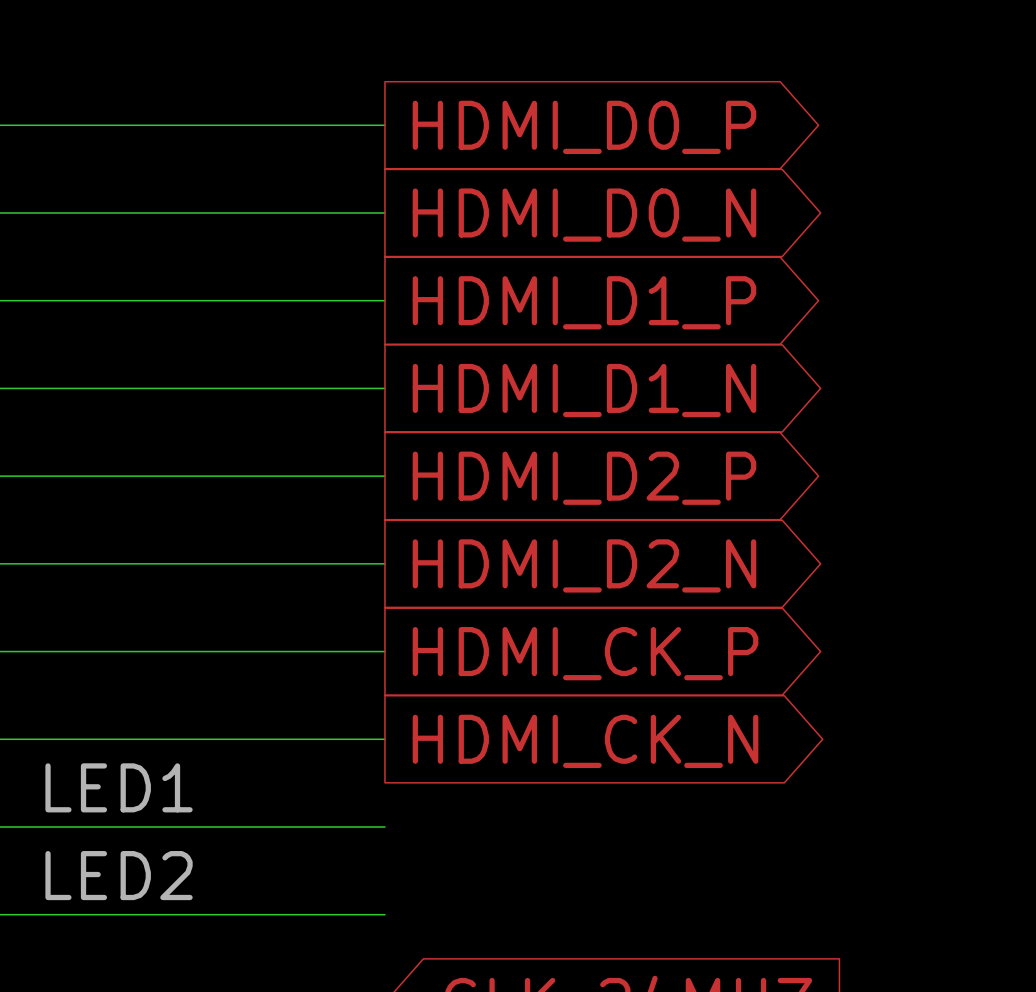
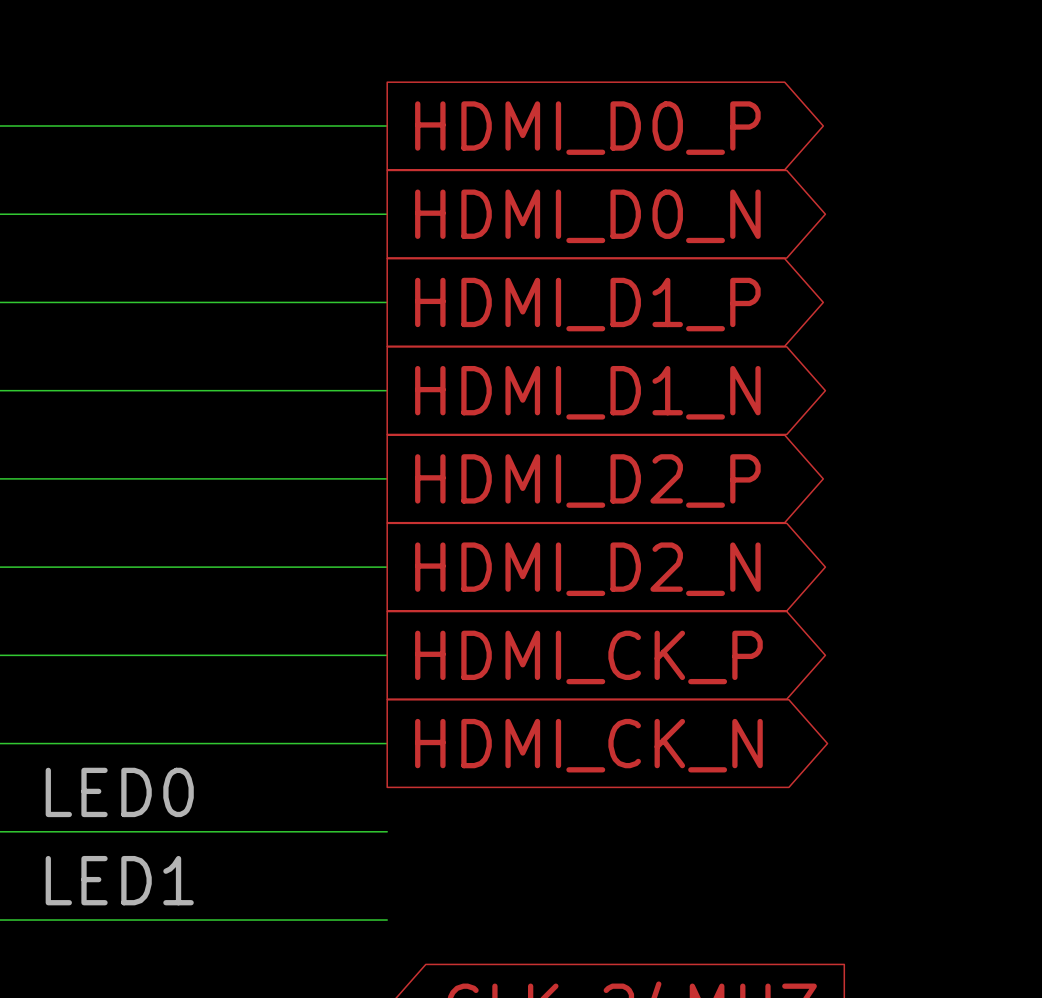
label: LED1 (119, 787) -> LED0 (119, 792)
label: LED2 (119, 875) -> LED1 (119, 880)

